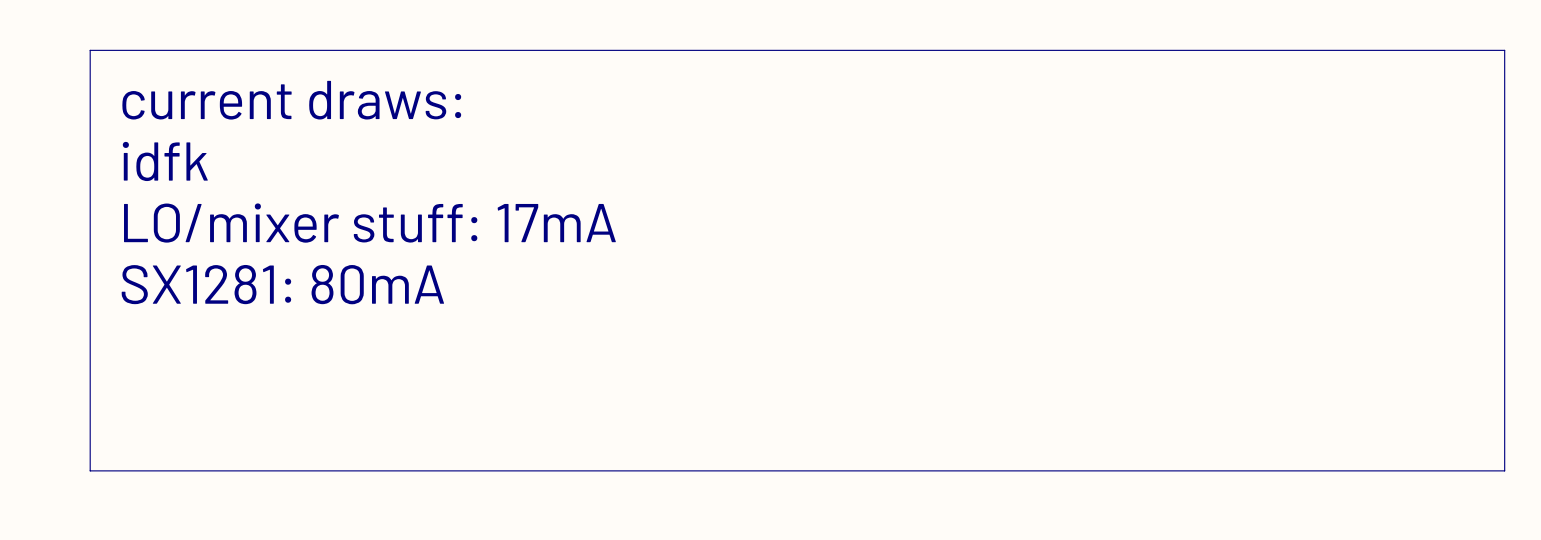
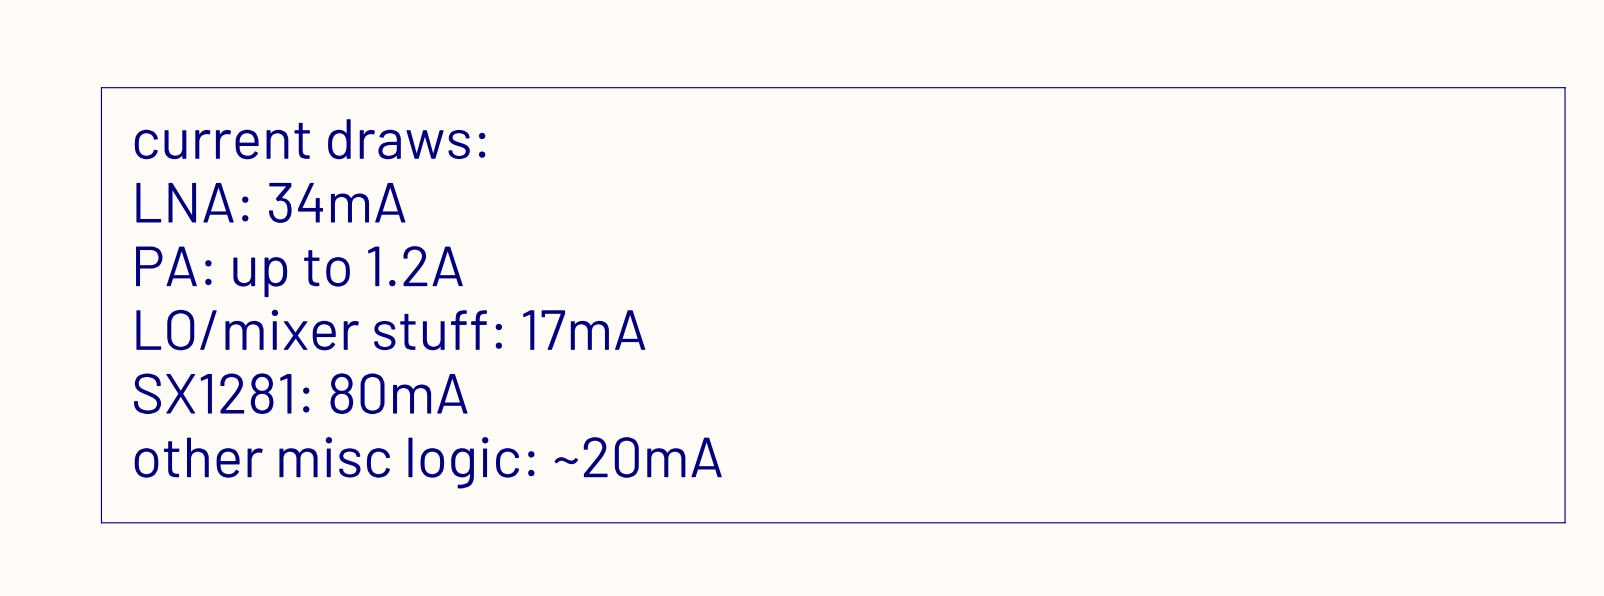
text: idfk (165, 161) -> LNA: 34mA (270, 202)
text: LO/mixer stuff: 17mA (369, 223) -> PA: up to 1.2A (299, 271)
text: SX1281: 80mA (282, 284) -> LO/mixer stuff: 17mA (390, 330)
text: none -> SX1281: 80mA (300, 393)
text: none -> other misc logic: ~20mA (428, 462)

